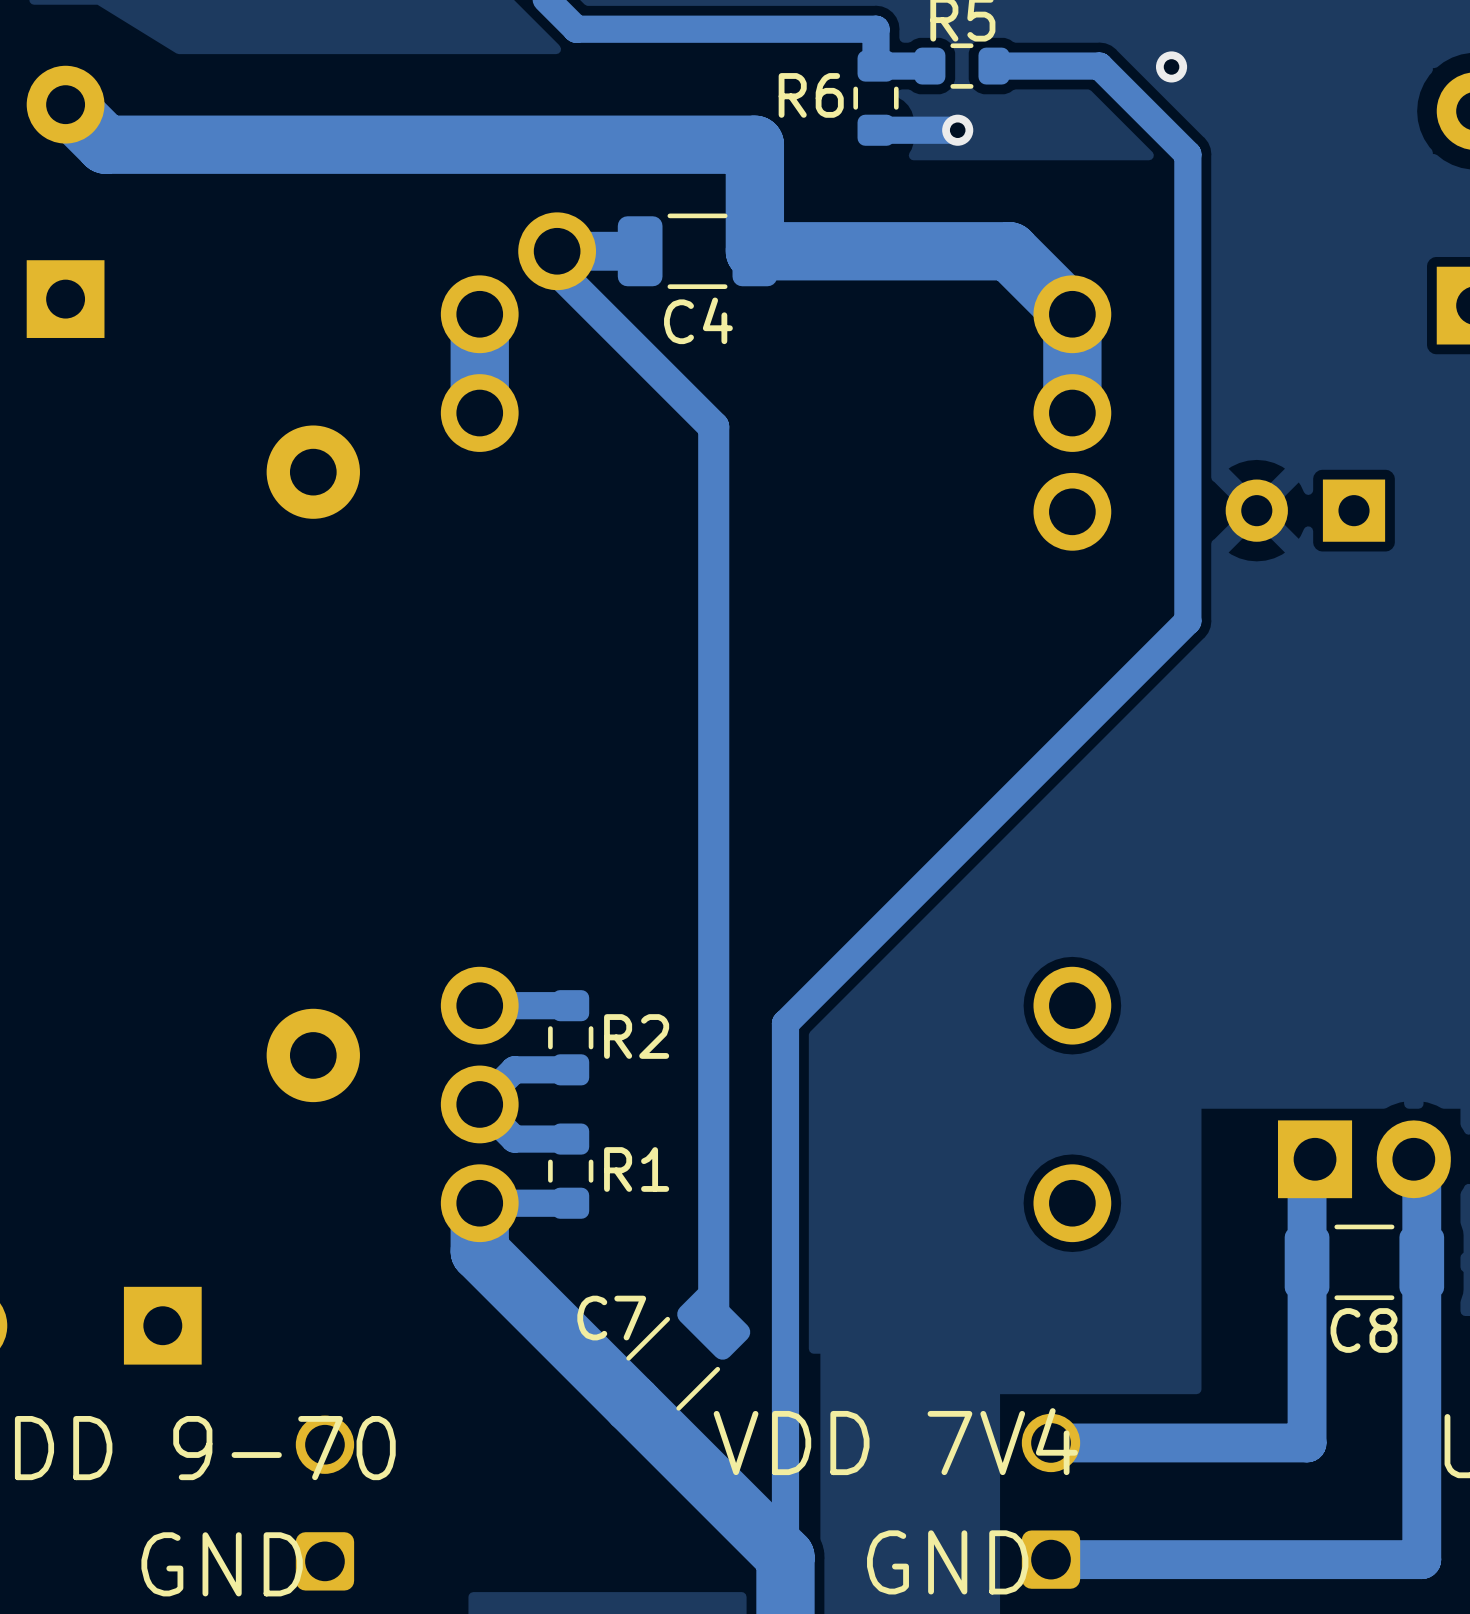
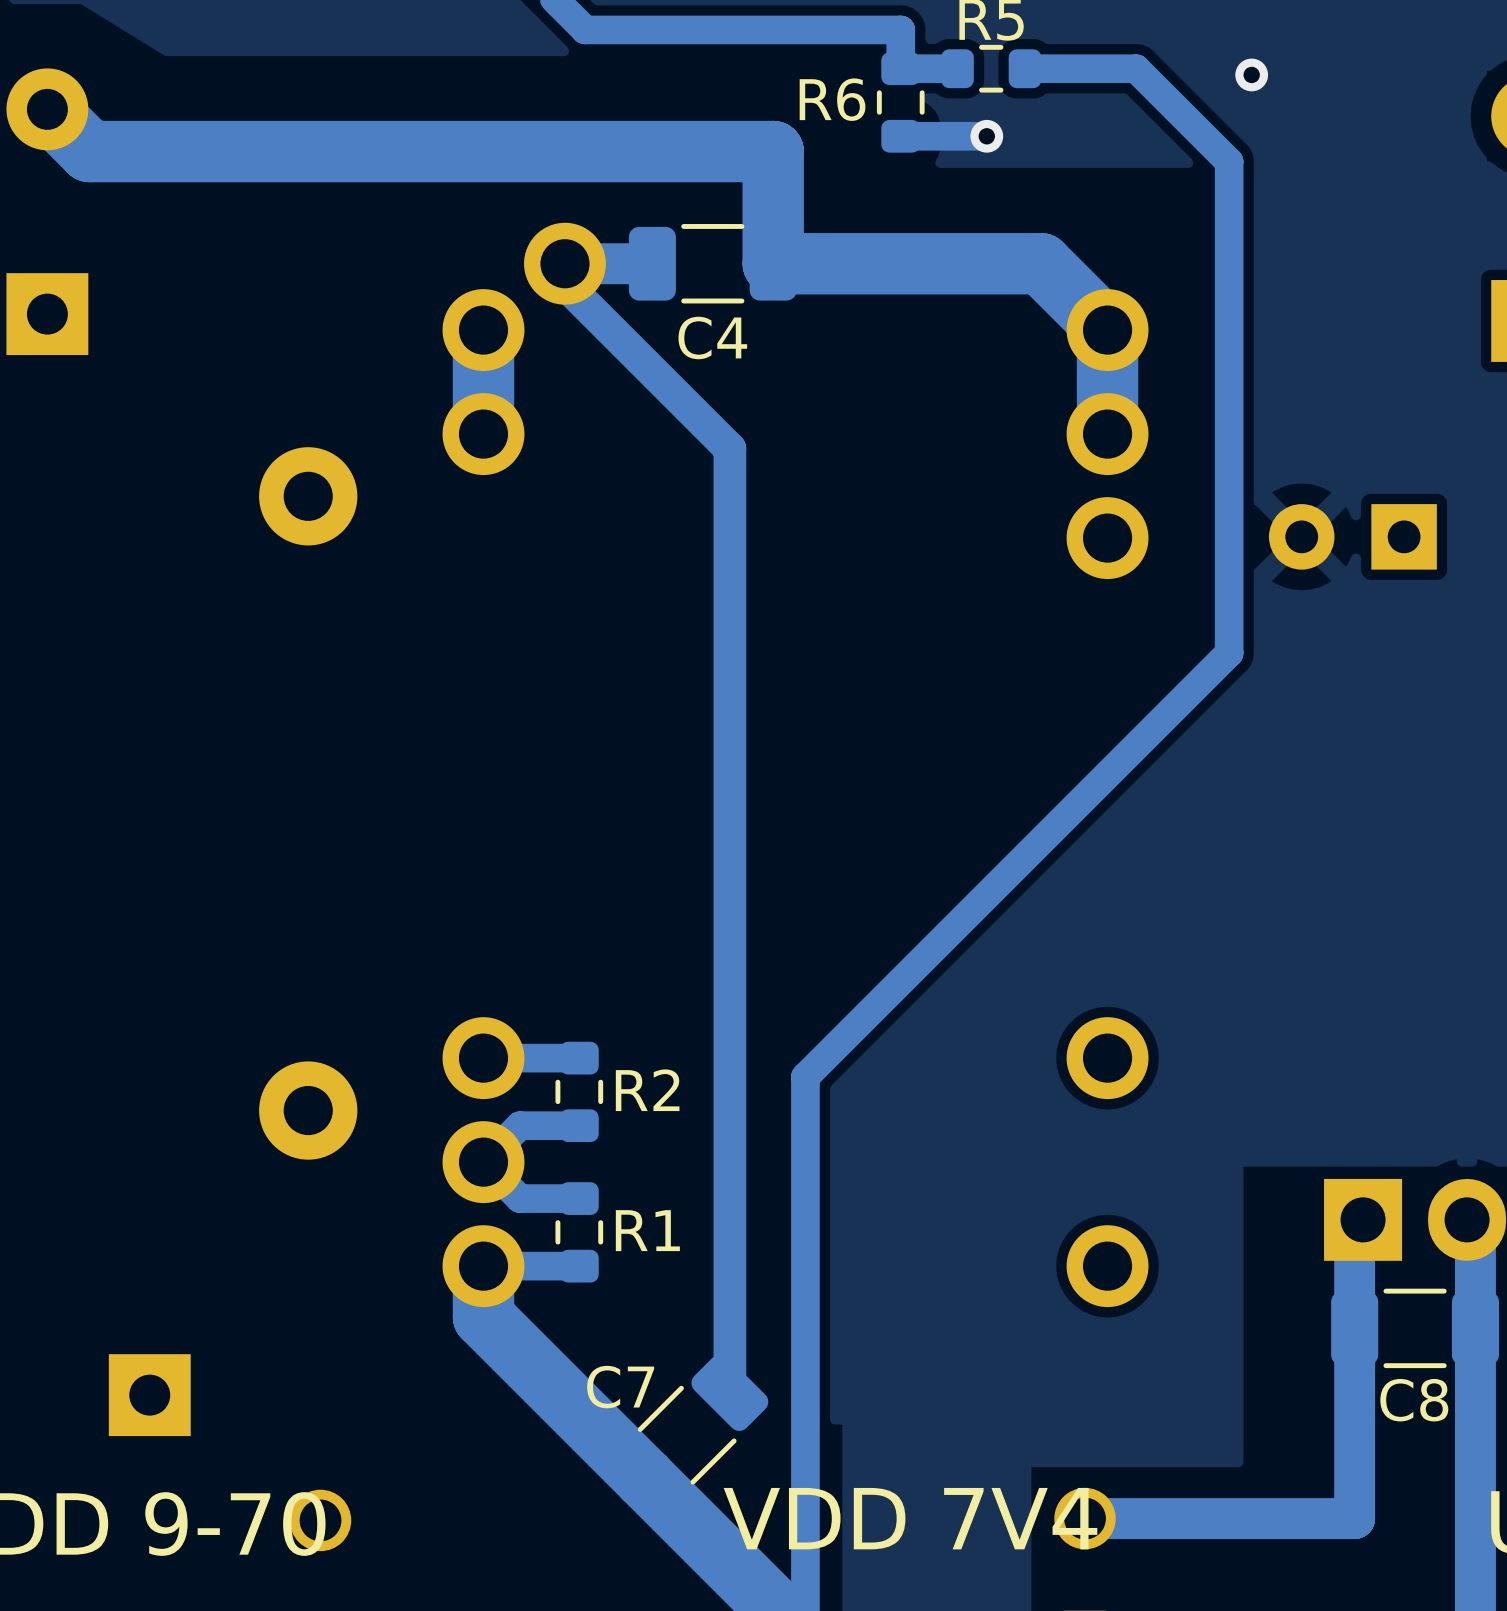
via position: (1171, 66) -> (1251, 74)

